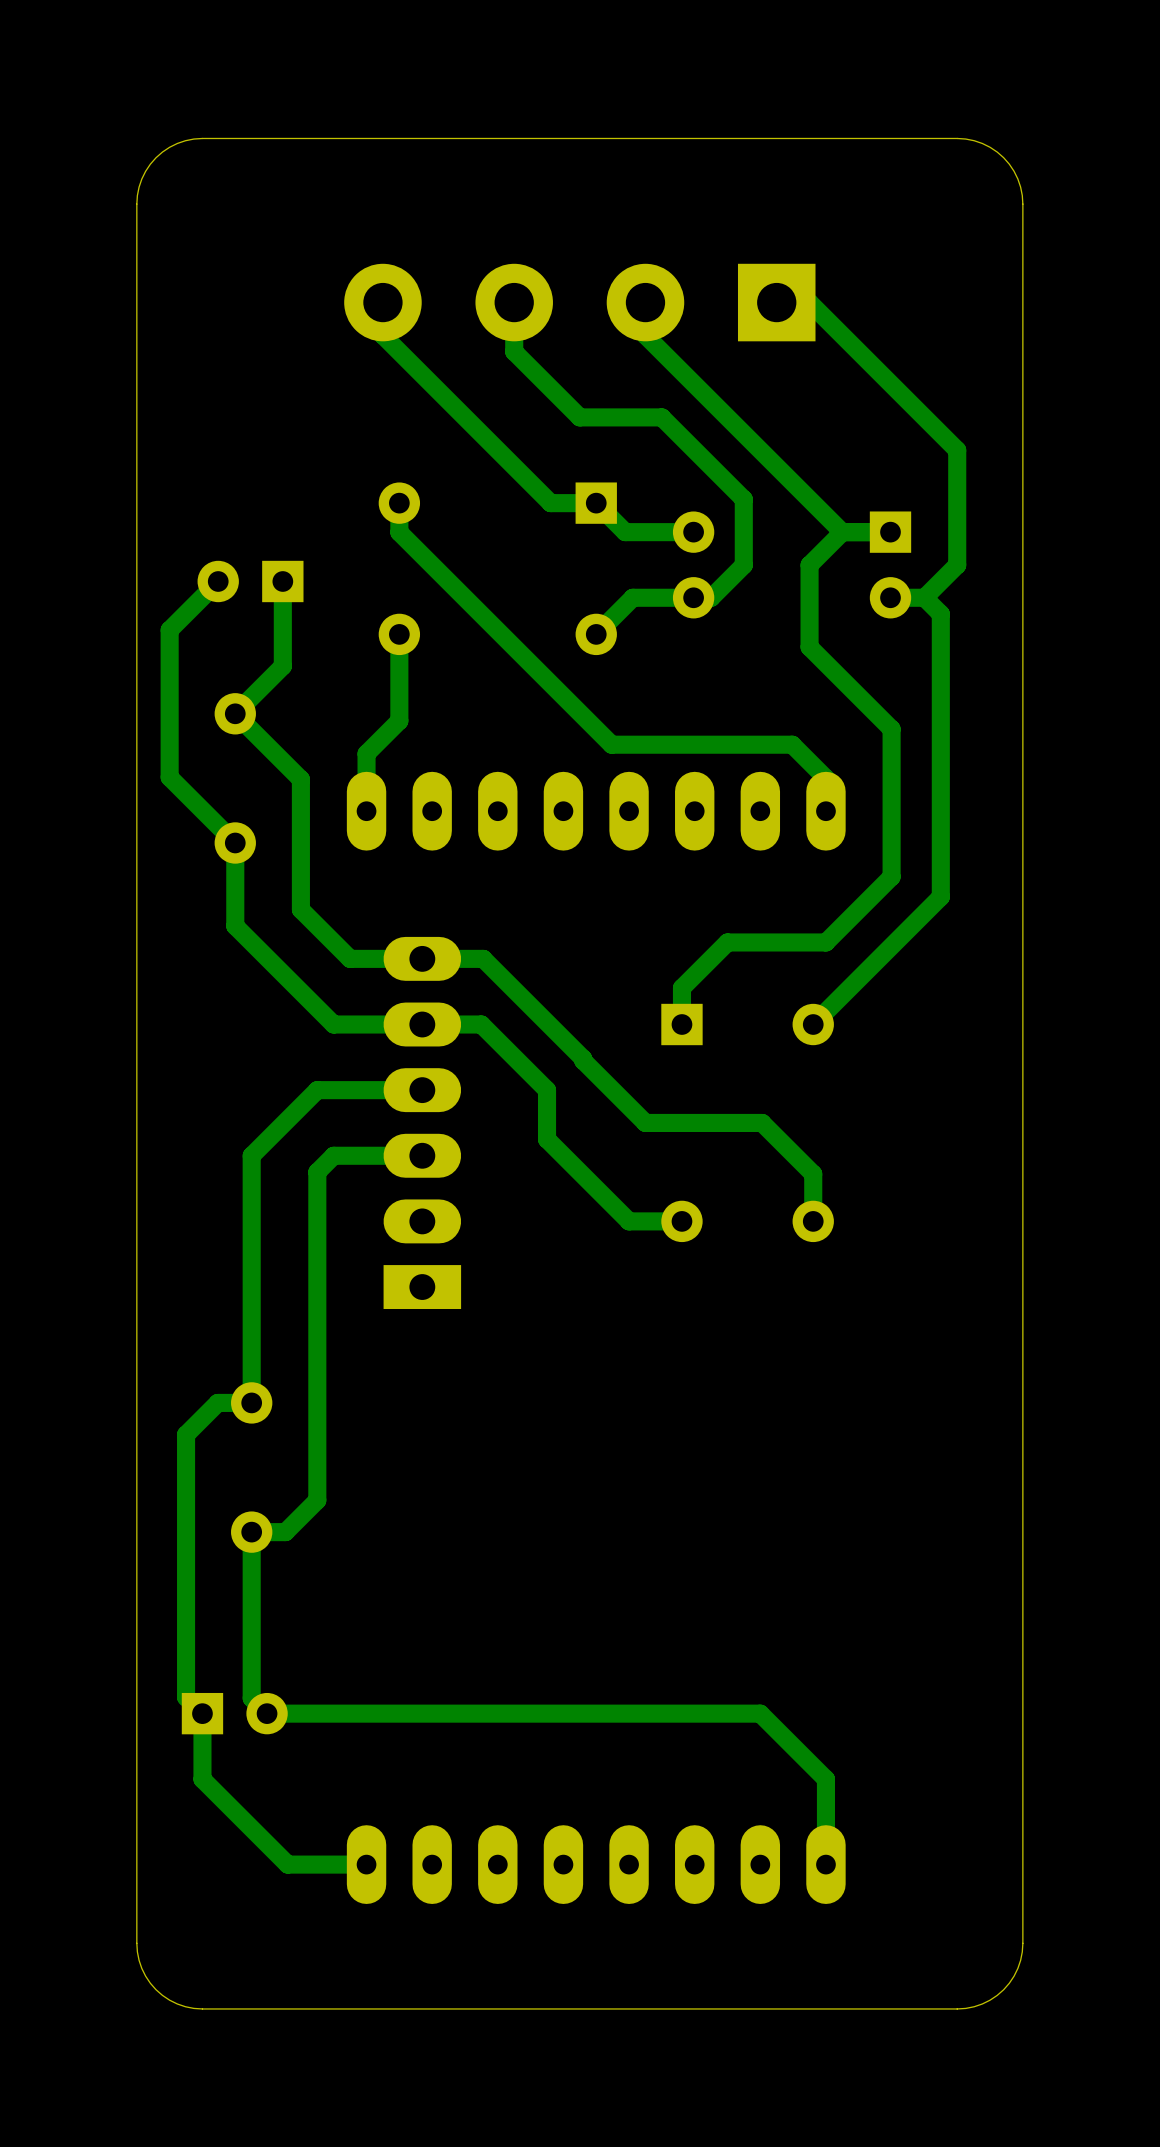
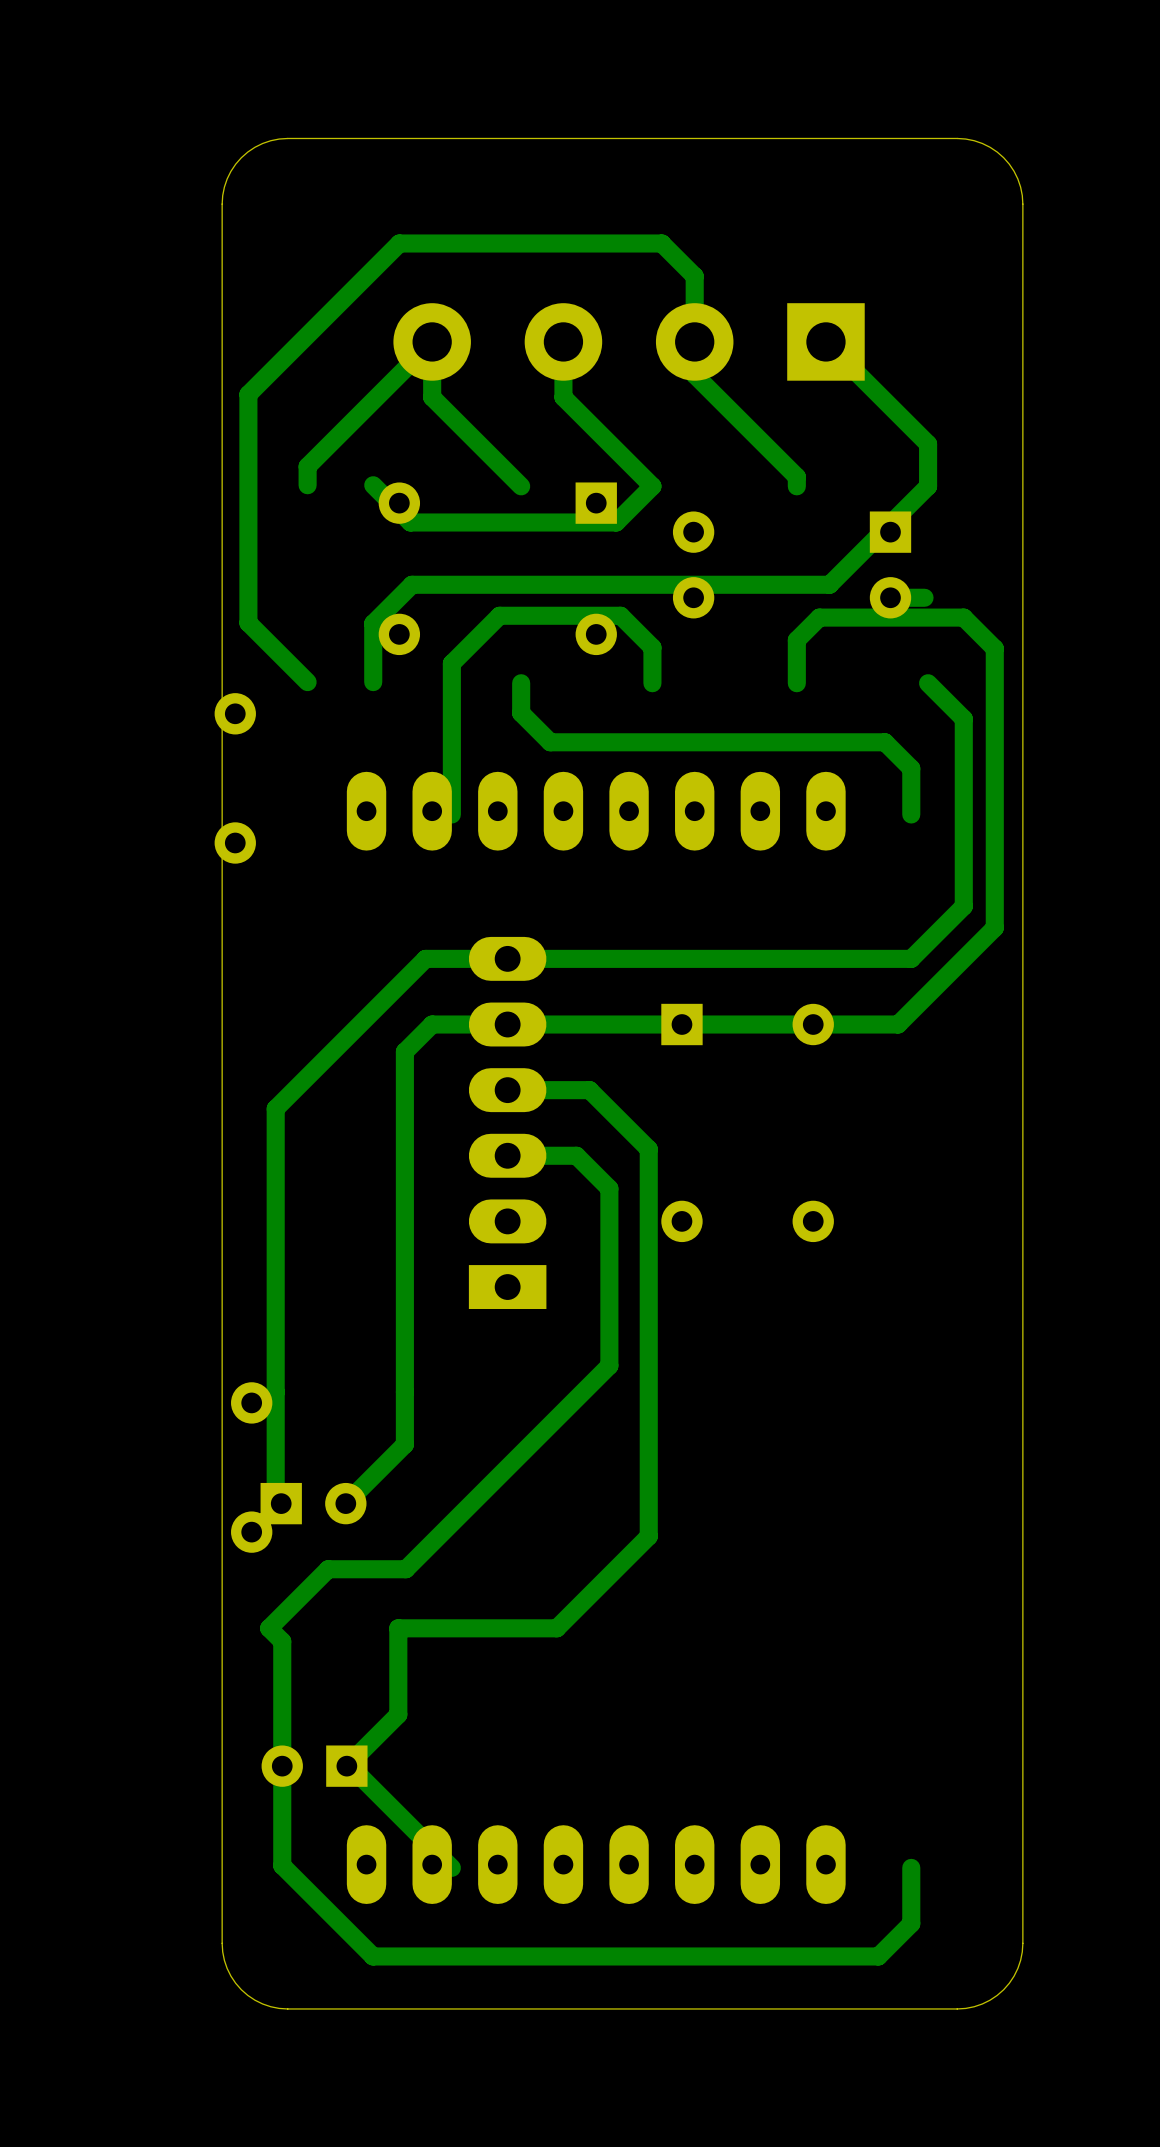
board edge: (287, 138) (202, 138) (177, 143) (162, 152) (150, 164) (139, 187) (136, 204) (137, 1951) (141, 1968) (150, 1983) (162, 1995) (177, 2003) (202, 2008) (287, 2008) -> (287, 138) (262, 143) (241, 157) (227, 178) (222, 204) (222, 1943) (227, 1968) (241, 1989) (262, 2003) (287, 2008)
bottom track: (382, 302) (382, 335) (550, 503) (596, 503) (625, 532) (693, 532) -> none
bottom track: (514, 302) (514, 351) (579, 417) (661, 417) (743, 499) (743, 565) (711, 597) (632, 597) (596, 634) -> none
part position: (579, 302) -> (629, 341)
bottom track: (645, 302) (645, 335) (842, 532) (890, 532) -> none
bottom track: (776, 302) (809, 302) (957, 450) (957, 565) (924, 597) (940, 614) (940, 896) (813, 1024) -> none
bottom track: none -> (563, 341) (563, 397) (652, 486) (616, 522) (410, 522) (373, 485)
bottom track: none -> (825, 341) (928, 444) (928, 486) (829, 584) (412, 584) (373, 623) (373, 682)
bottom track: none -> (307, 485) (307, 466) (432, 341) (432, 397) (521, 486)
bottom track: none -> (796, 486) (796, 476) (694, 374) (694, 276) (661, 243) (399, 243) (248, 394) (248, 622) (307, 682)
bottom track: (399, 503) (399, 532) (611, 744) (792, 744) (825, 778) (825, 811) -> none
bottom track: (842, 532) (809, 565) (809, 647) (891, 729) (891, 876) (825, 942) (727, 942) (681, 988) (681, 1024) -> none
bottom track: (218, 581) (169, 630) (169, 777) (235, 842) (235, 926) (333, 1024) (432, 1024) -> (345, 1503) (404, 1444) (404, 1051) (432, 1024)
part: (250, 581) -> none
bottom track: (282, 581) (282, 666) (235, 713) (300, 779) (300, 909) (350, 958) (425, 958) -> (281, 1503) (275, 1498) (275, 1108) (425, 958)
bottom track: (399, 634) (399, 720) (366, 753) (366, 811) -> none
bottom track: none -> (521, 683) (521, 713) (550, 742) (885, 742) (911, 768) (911, 814)
bottom track: none -> (652, 683) (652, 647) (620, 615) (499, 615) (451, 663) (451, 814)
bottom track: (483, 958) (645, 1122) (762, 1122) (813, 1174) (813, 1221) -> (483, 958) (911, 958) (963, 906) (963, 718) (928, 683)
bottom track: (481, 1024) (547, 1090) (547, 1139) (629, 1221) (681, 1221) -> (481, 1024) (898, 1024) (994, 927) (994, 648) (963, 617) (819, 617) (796, 640) (796, 683)
bottom track: (422, 1090) (317, 1090) (251, 1155) (251, 1402) (217, 1402) (186, 1434) (186, 1697) (202, 1713) (202, 1779) (287, 1864) (366, 1864) -> none
bottom track: none -> (507, 1090) (589, 1090) (648, 1149) (648, 1536) (556, 1628) (398, 1628) (398, 1714) (346, 1766) (350, 1766) (451, 1867)
part position: (422, 1122) -> (507, 1122)
bottom track: (422, 1155) (333, 1155) (317, 1172) (317, 1500) (285, 1532) (251, 1532) (251, 1698) (267, 1713) (760, 1713) (825, 1779) (825, 1864) -> none
bottom track: none -> (507, 1155) (576, 1155) (609, 1188) (609, 1365) (405, 1569) (328, 1569) (269, 1628) (282, 1641) (282, 1865) (373, 1956) (878, 1956) (911, 1923) (911, 1867)
part: none -> (313, 1503)
part rotation: 0° (234, 1713) -> 180° (314, 1766)
part position: (234, 1713) -> (314, 1766)

